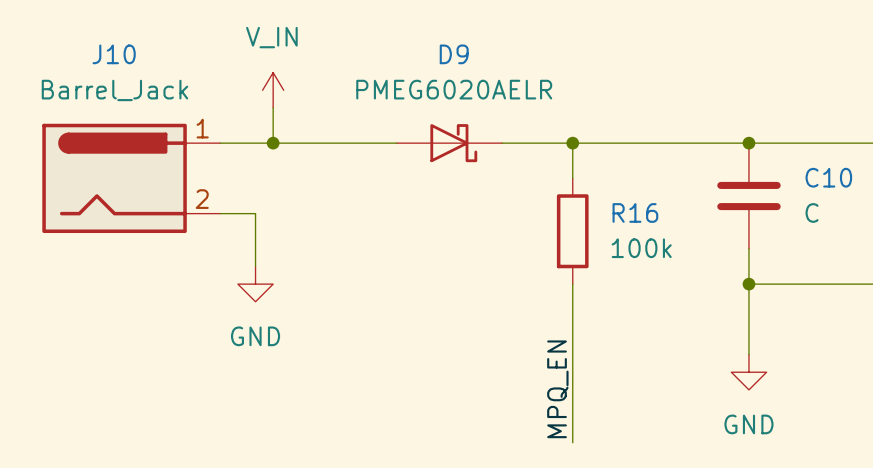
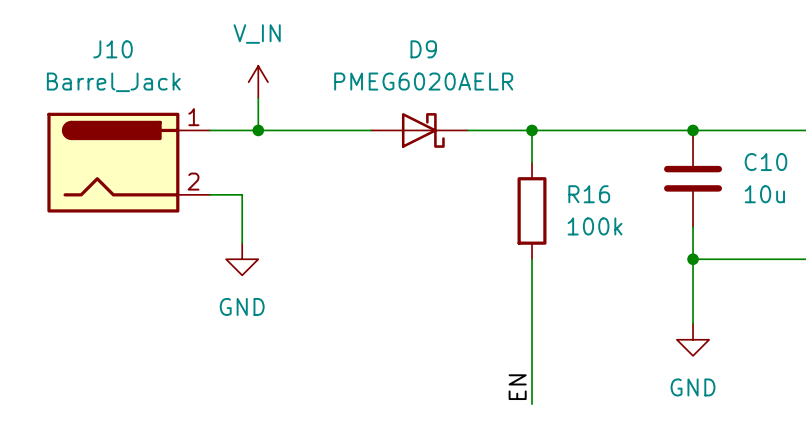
C10 value: C (812, 212) -> 10u (764, 194)
label: MPQ_EN (557, 389) -> EN (517, 387)

